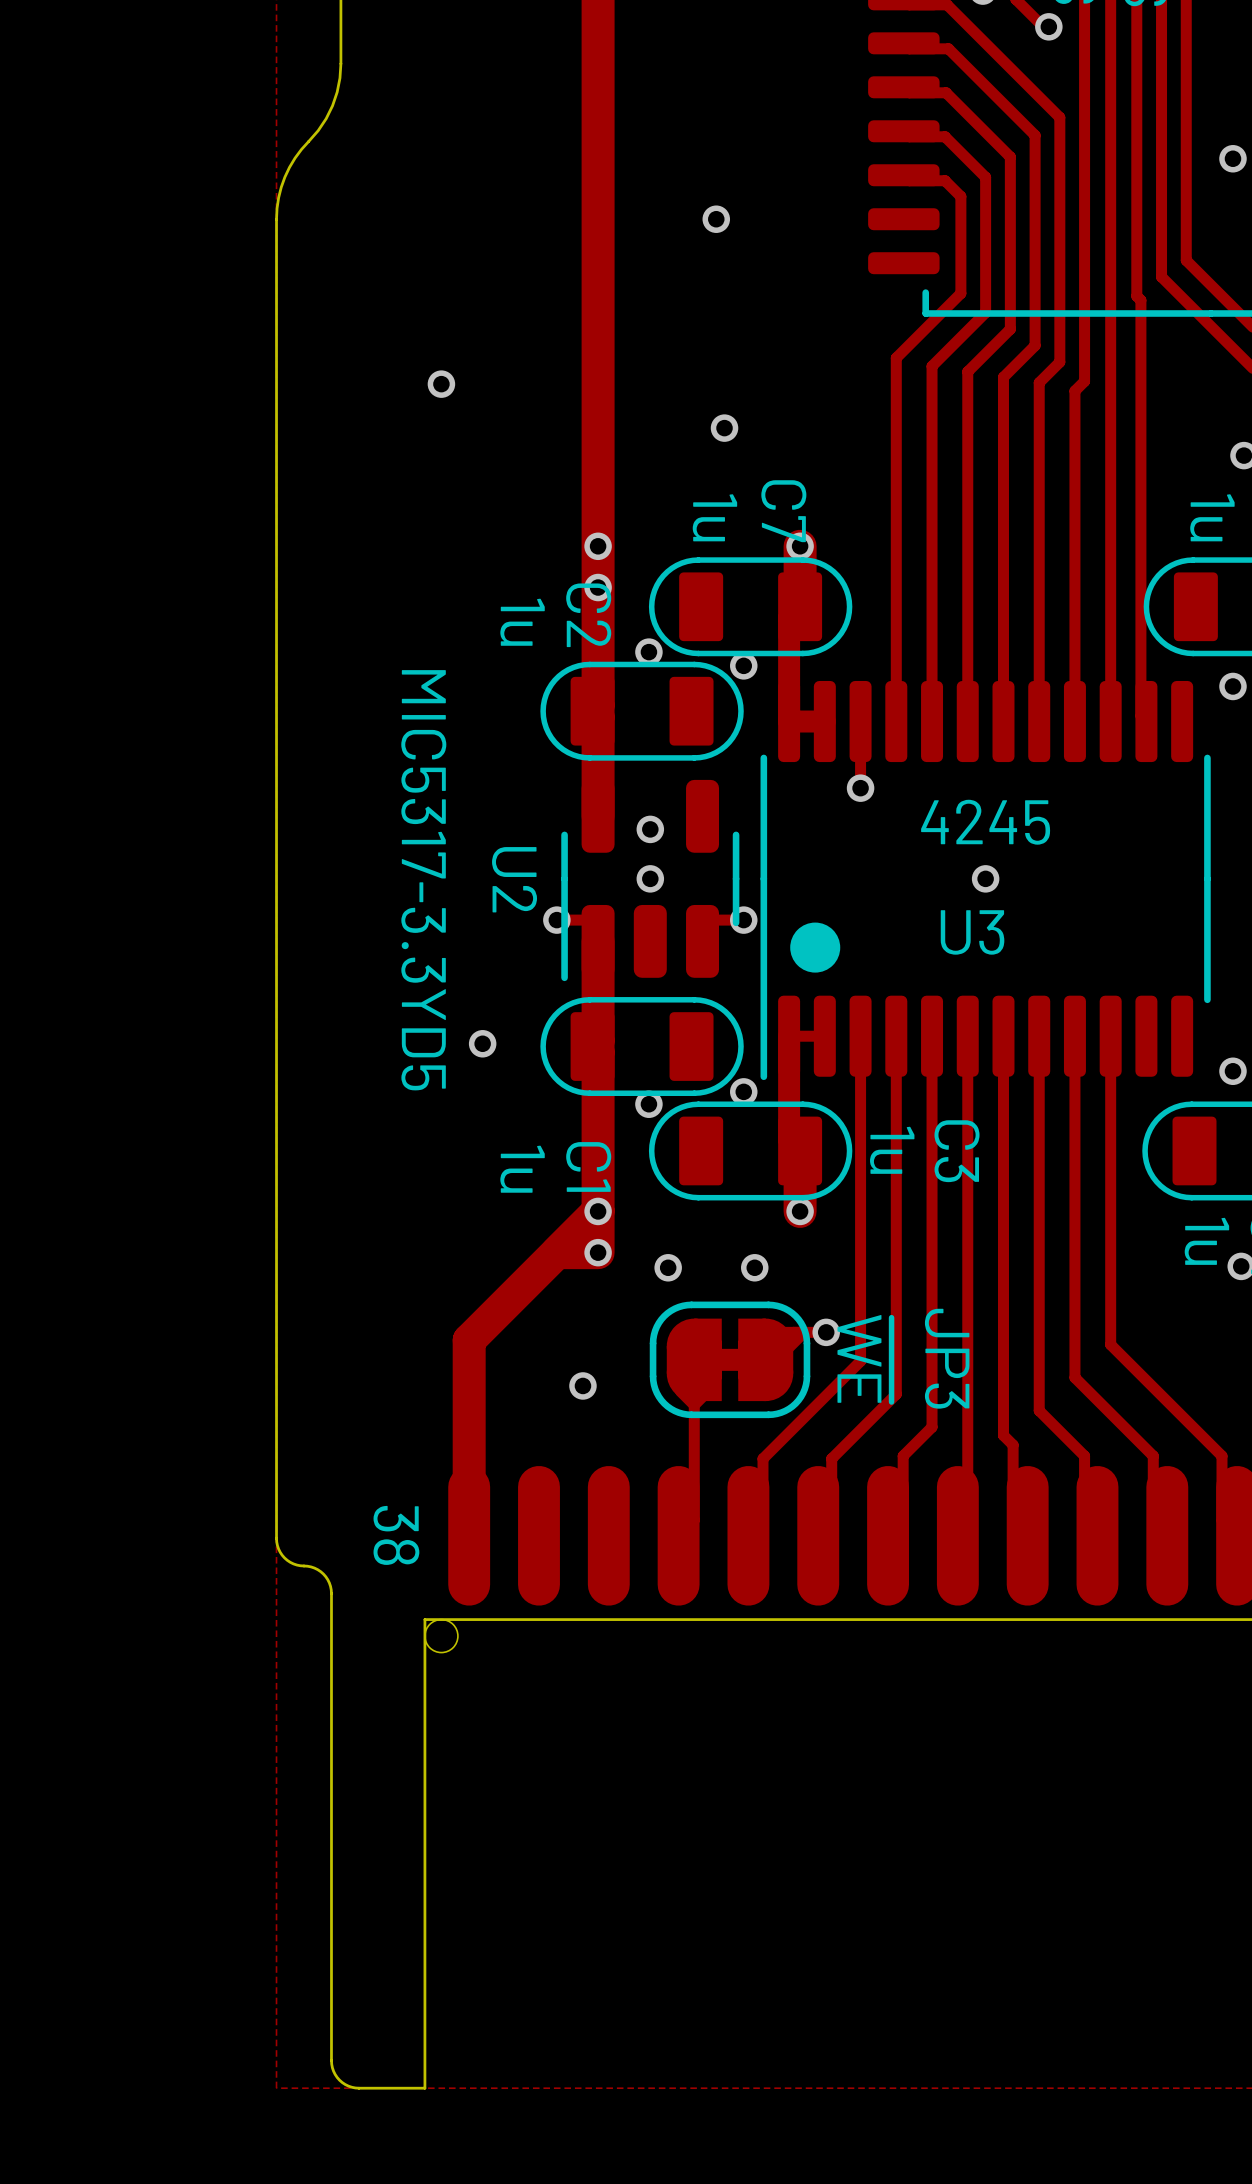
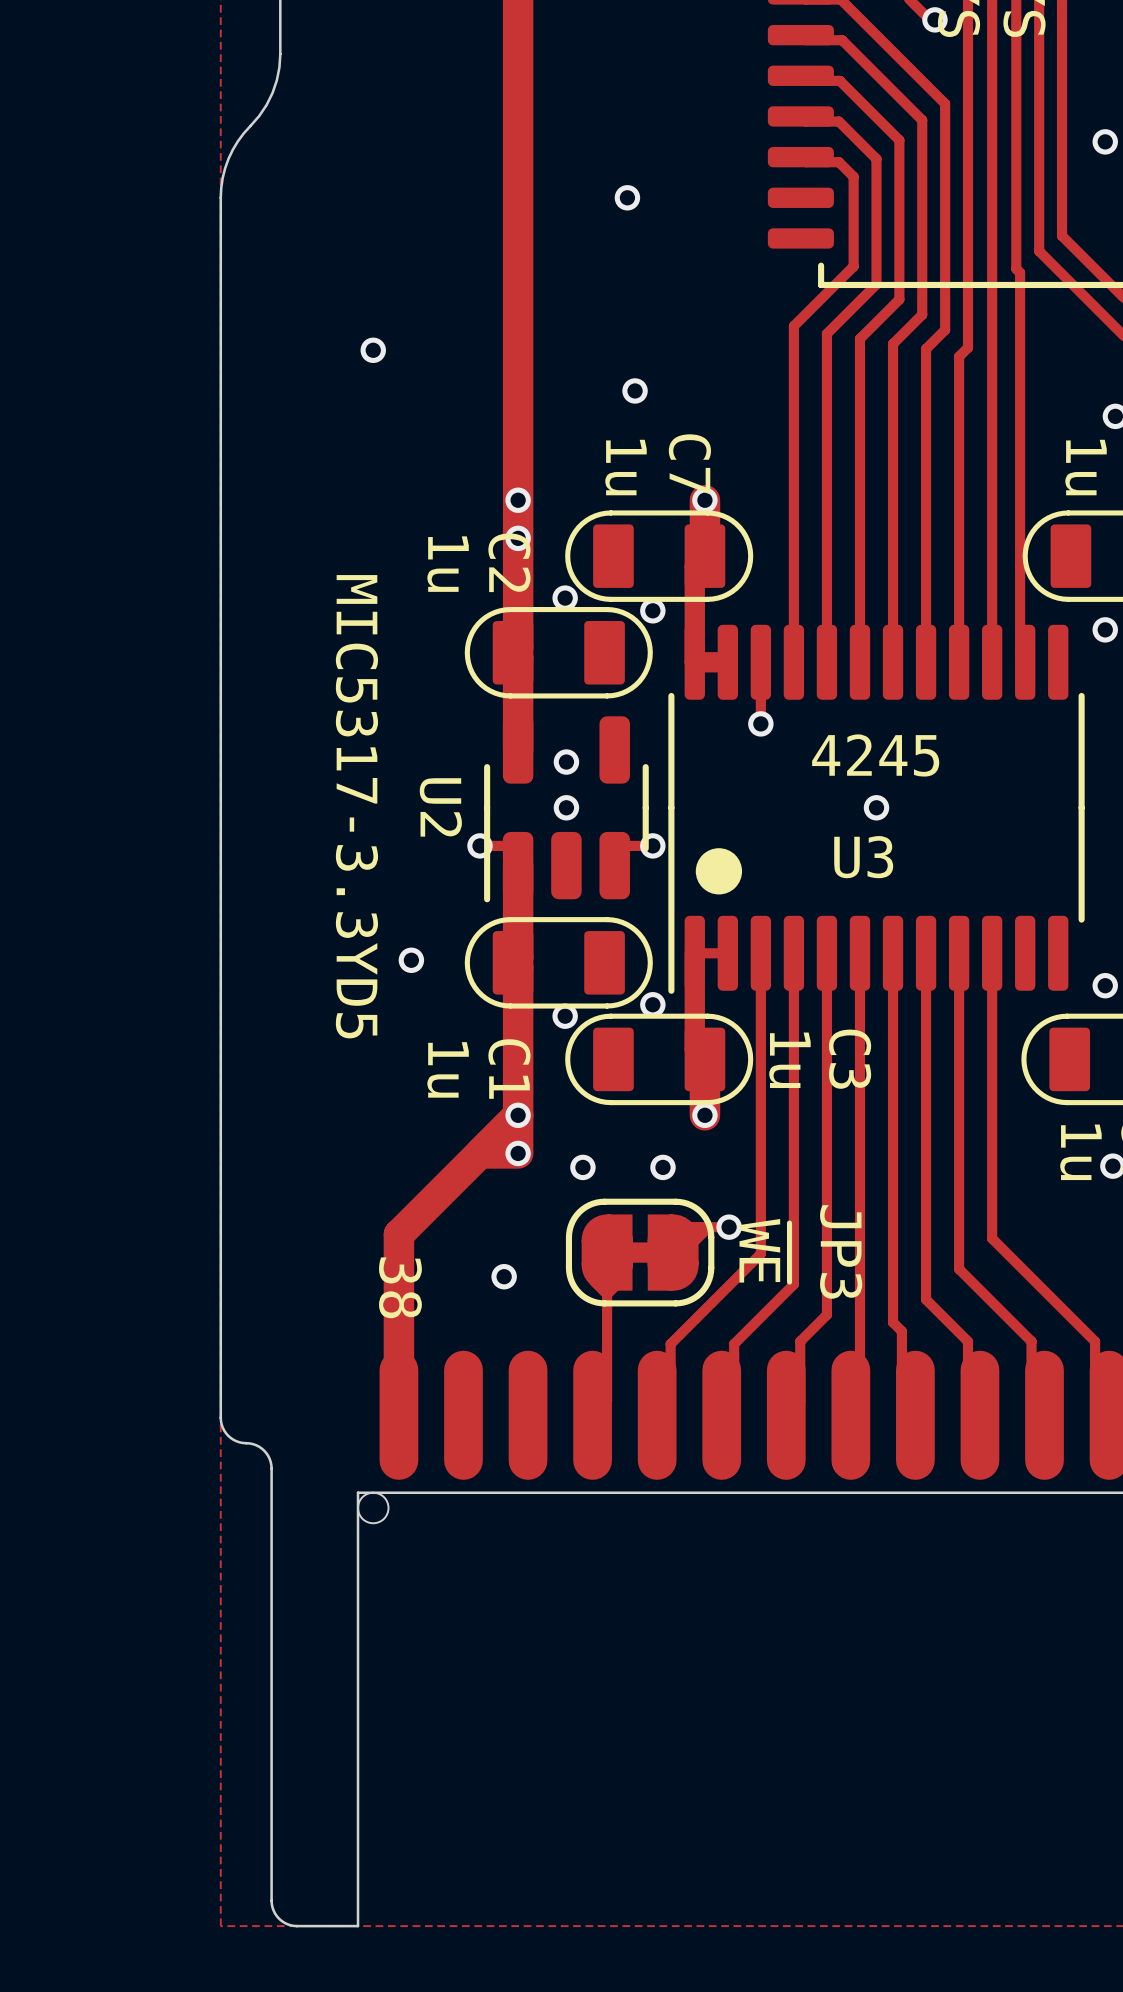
text position: 38 (396, 1535) -> 38 (400, 1287)

